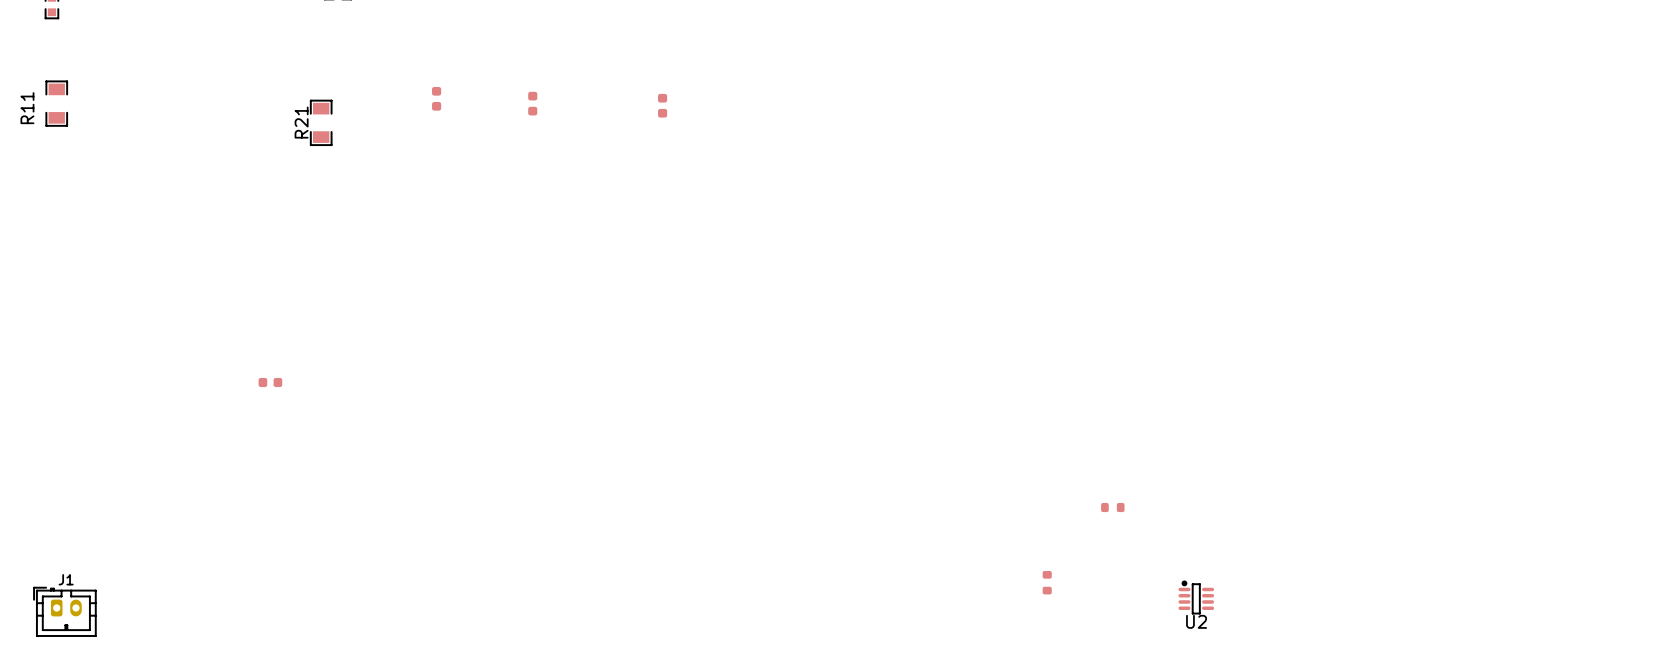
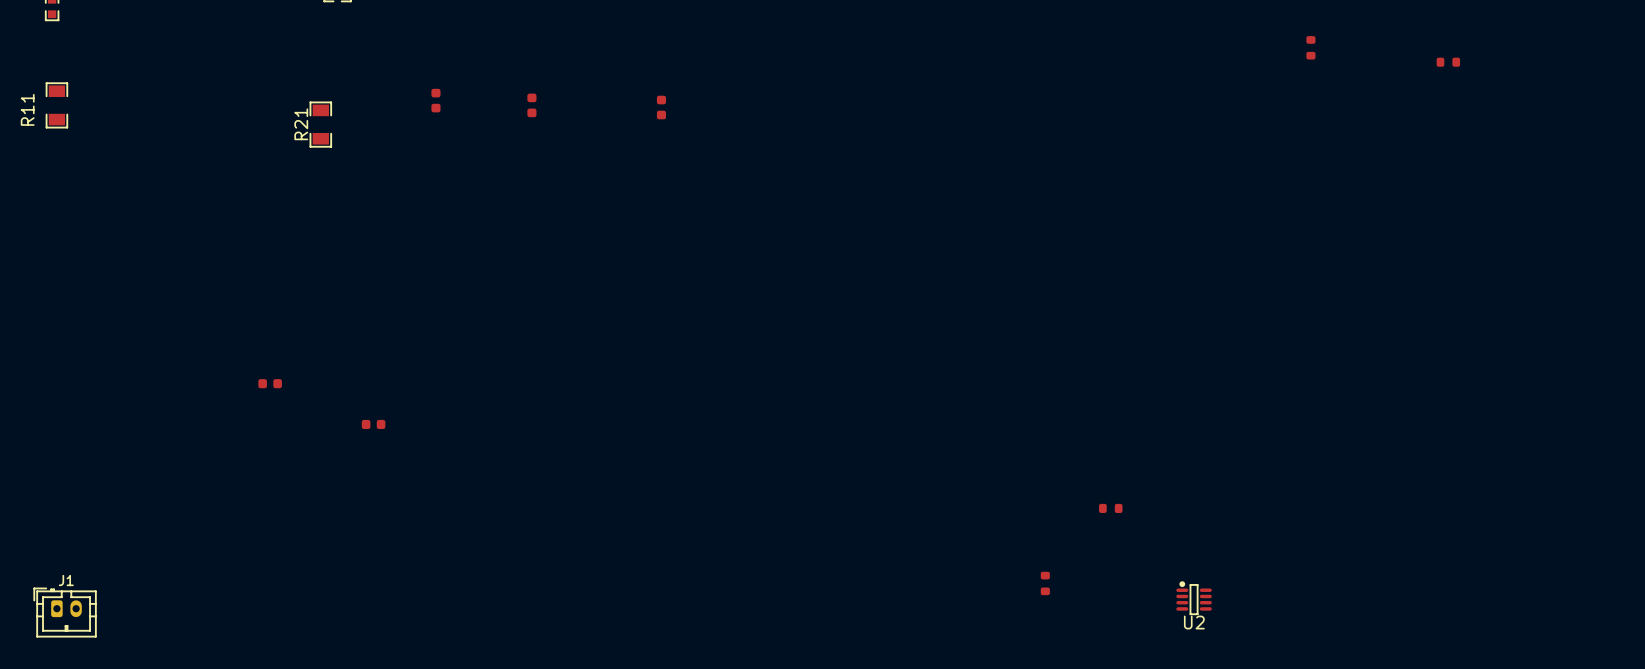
part: none -> (1310, 47)
part: none -> (1448, 62)
part: none -> (373, 424)

